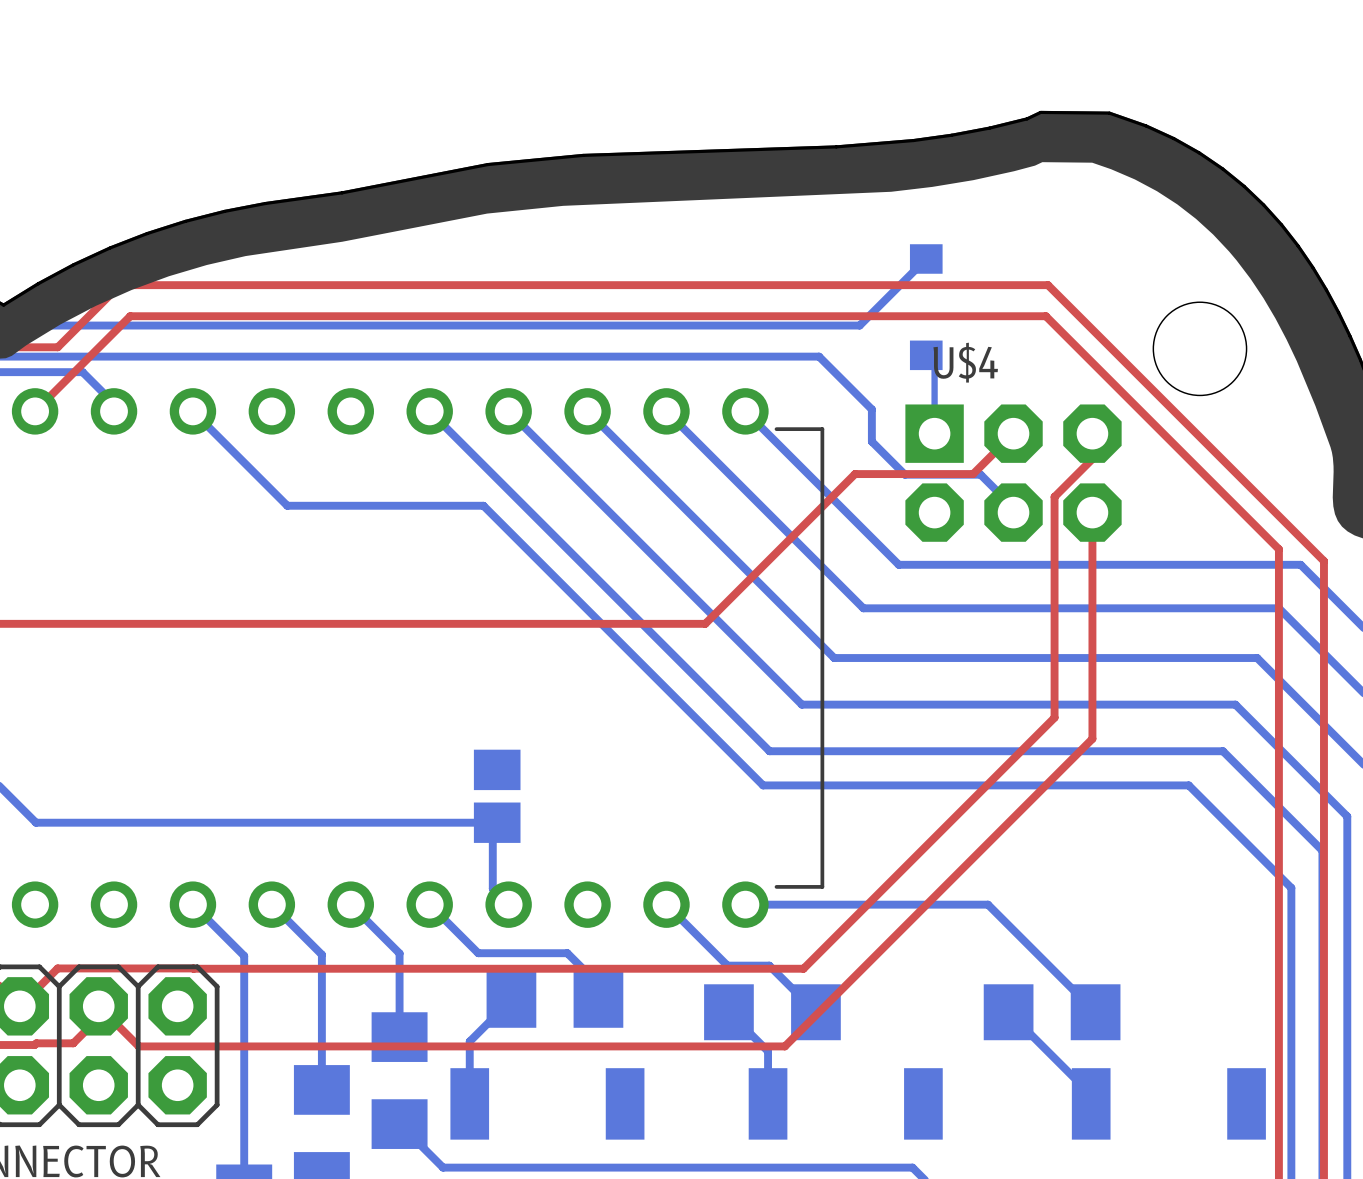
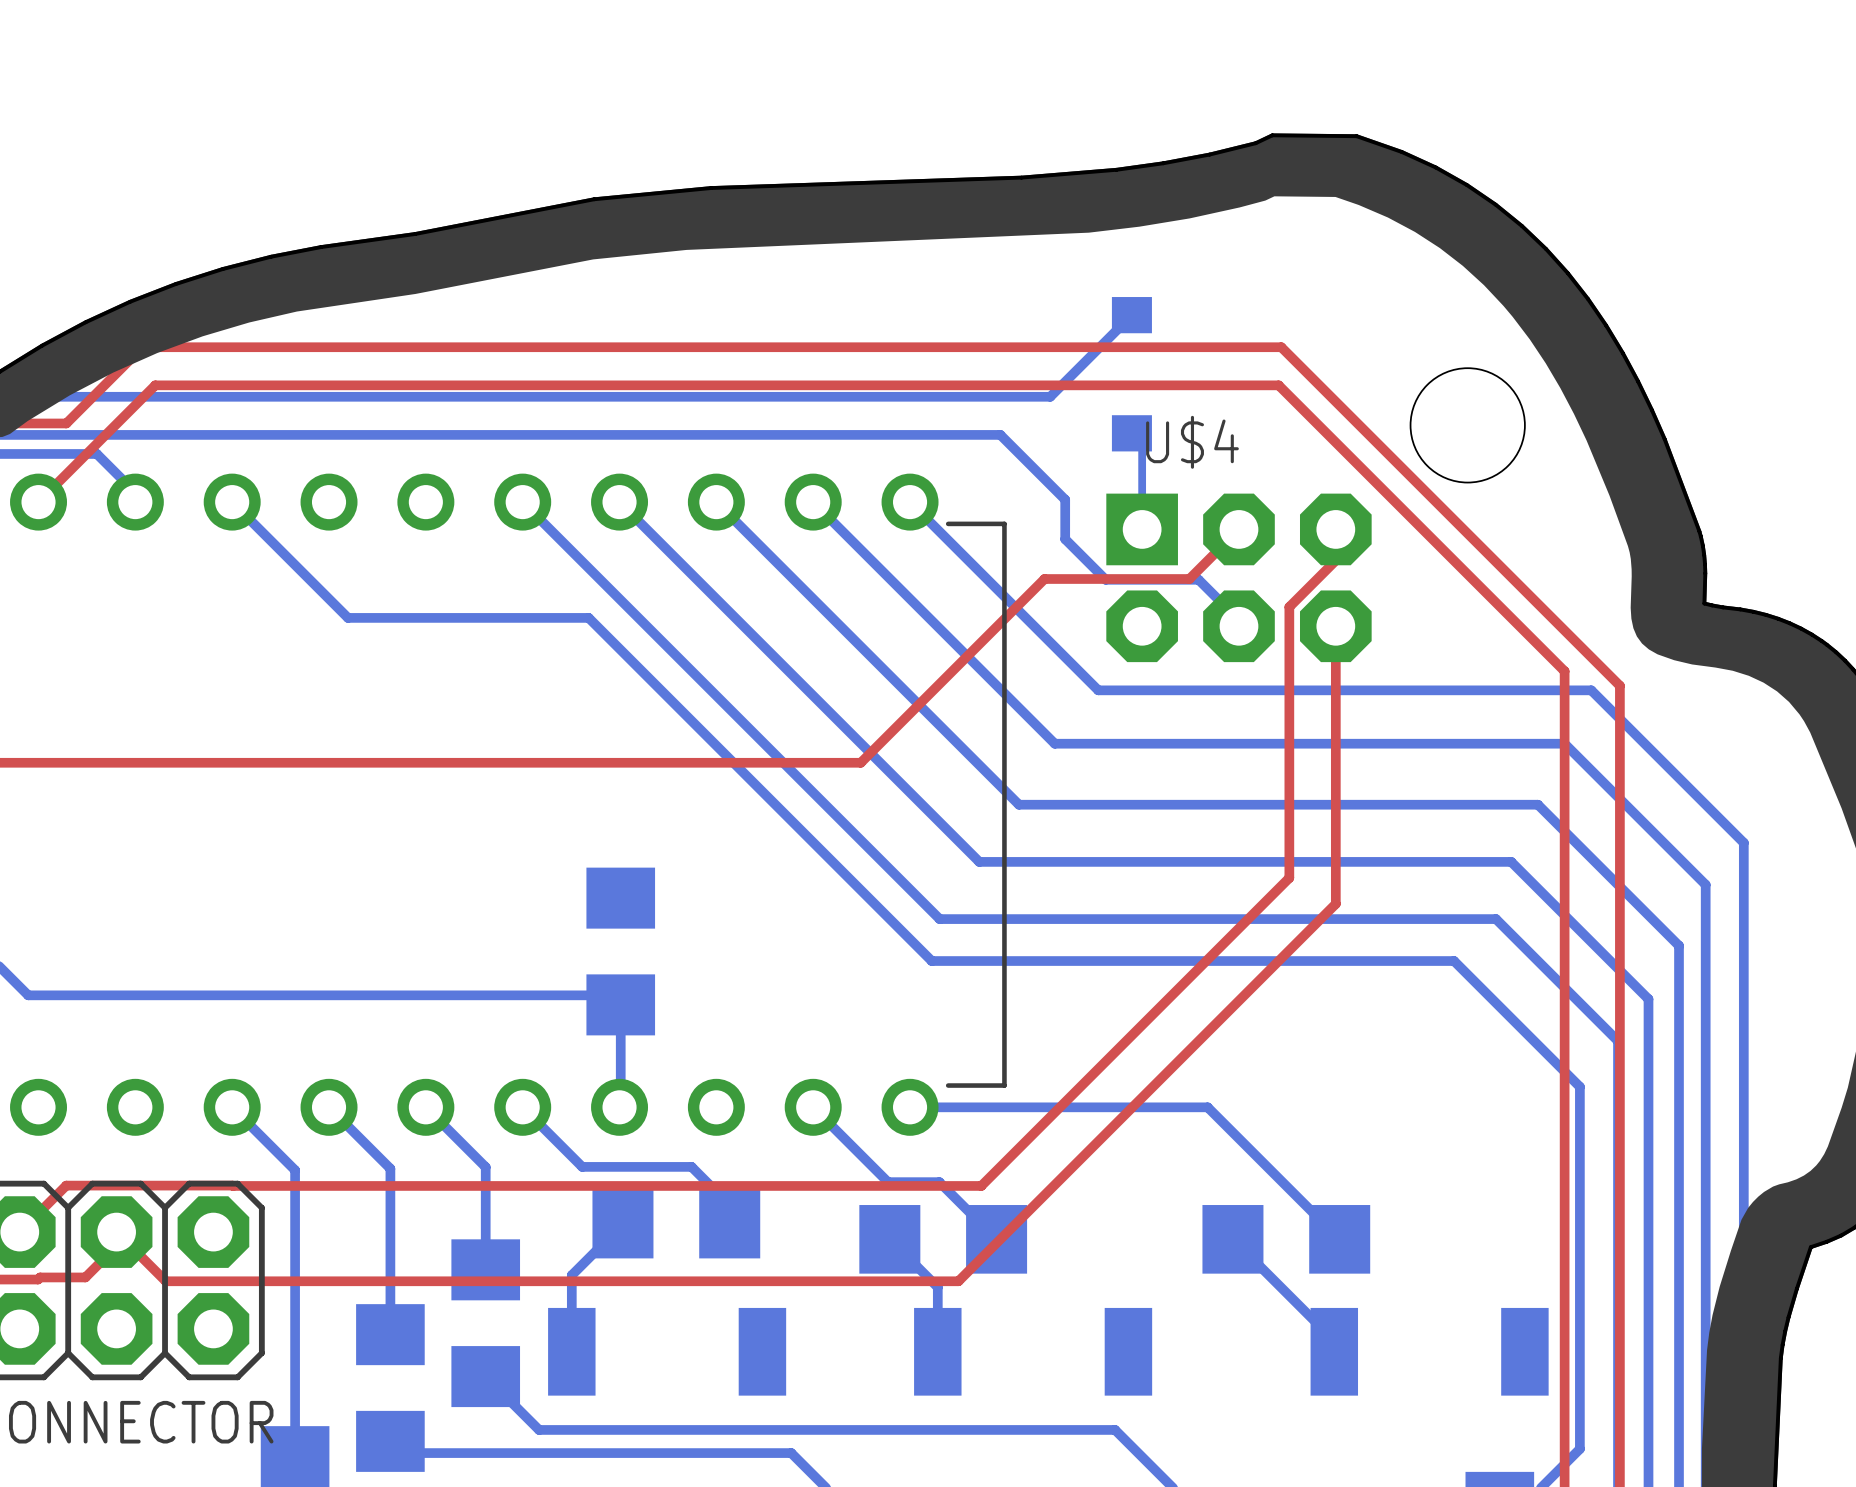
part footprint: [473, 749, 521, 843] -> [586, 867, 656, 1036]
bottom track: (26, 813) (36, 822) (497, 822) -> (28, 995) (611, 995) (620, 1004) (619, 1107)
bottom track: (492, 822) (492, 888) (508, 904) -> none

